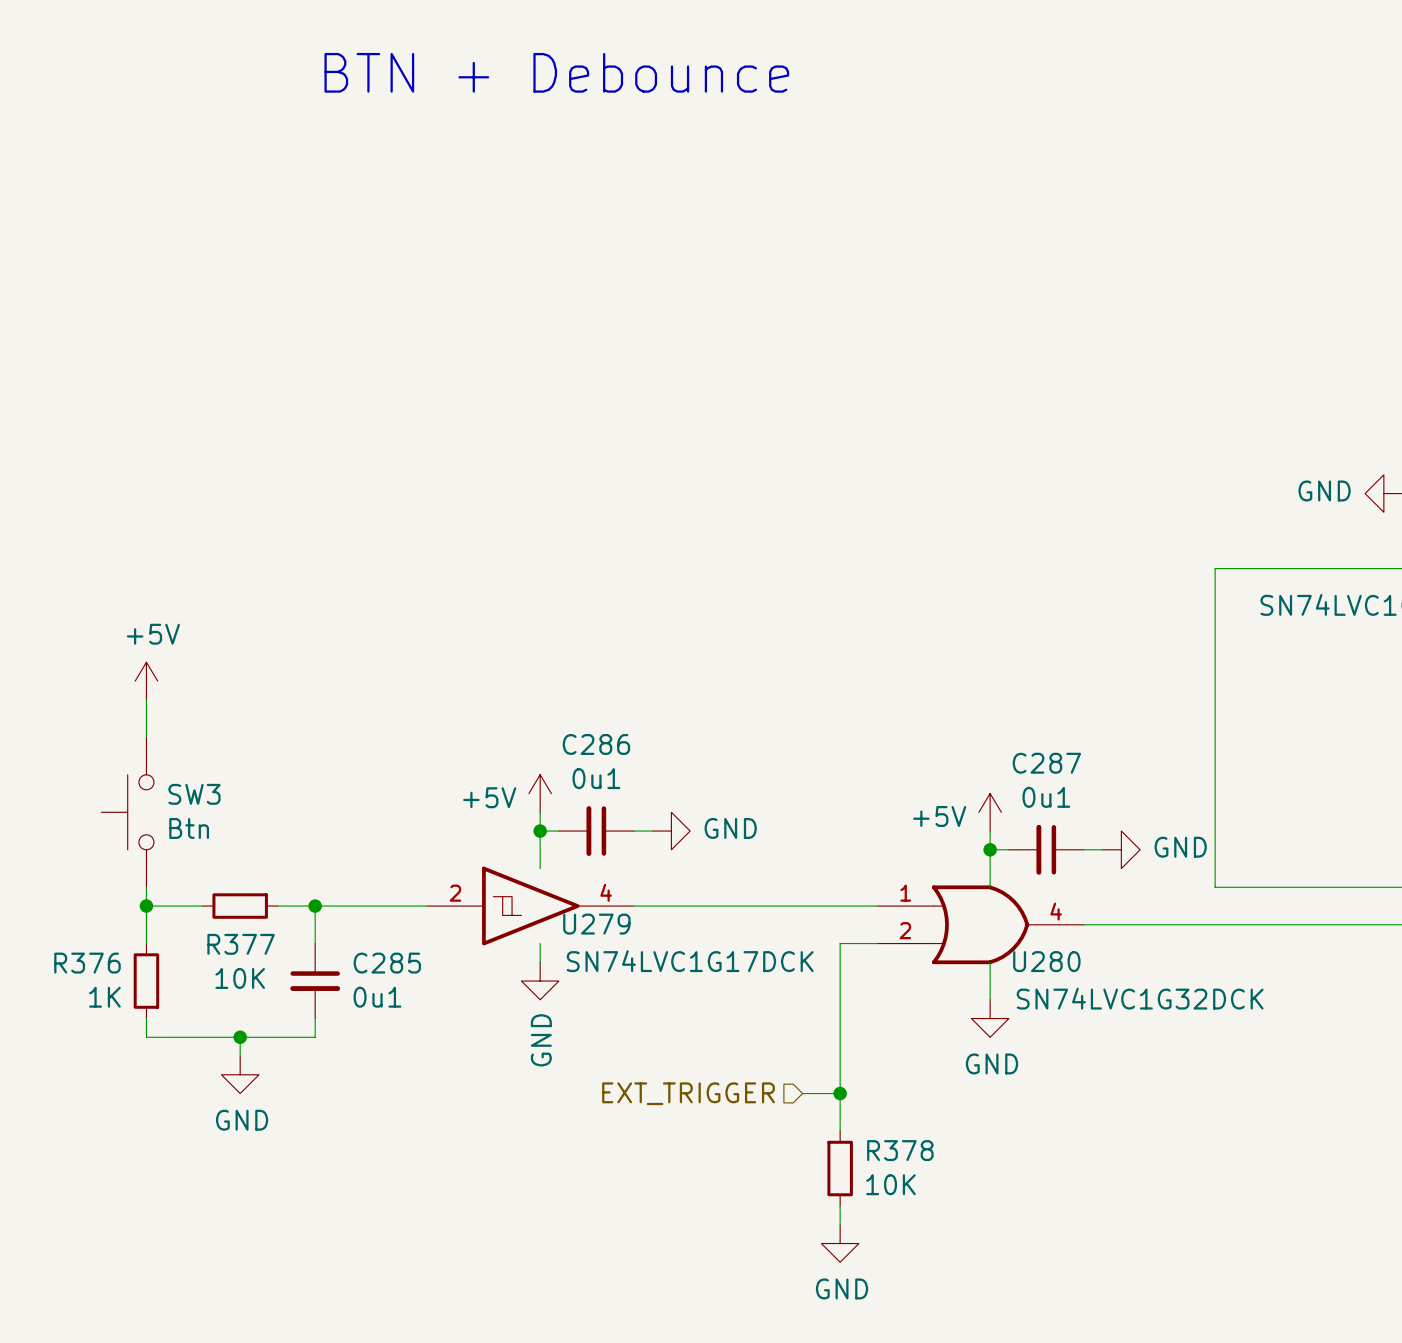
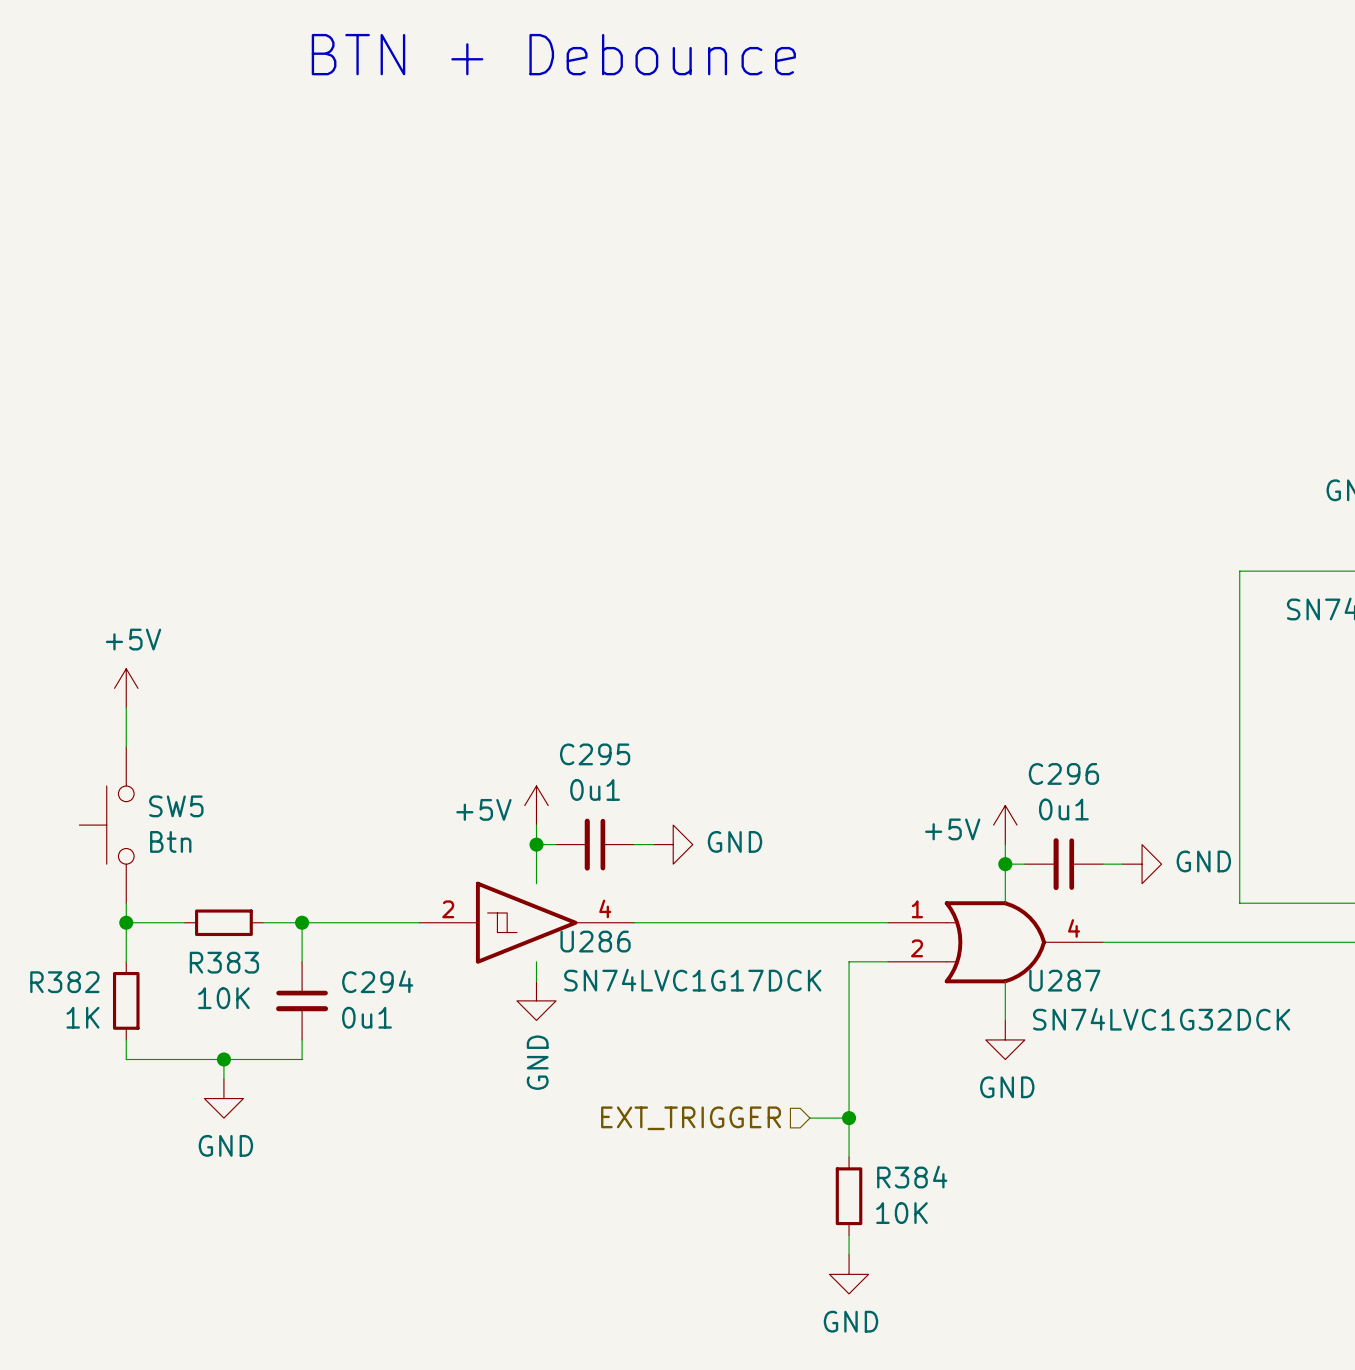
C286 name: C286 (596, 744) -> C295 (595, 754)
C287 name: C287 (1046, 763) -> C296 (1063, 773)
SW3 name: SW3 (194, 794) -> SW5 (176, 806)
U279 name: U279 (596, 924) -> U286 (595, 941)
R377 name: R377 (241, 944) -> R383 (224, 962)
U280 name: U280 (1046, 961) -> U287 (1064, 980)
R376 name: R376 (87, 963) -> R382 (64, 982)
C285 name: C285 (387, 963) -> C294 (377, 981)
R378 name: R378 (900, 1150) -> R384 (912, 1177)

